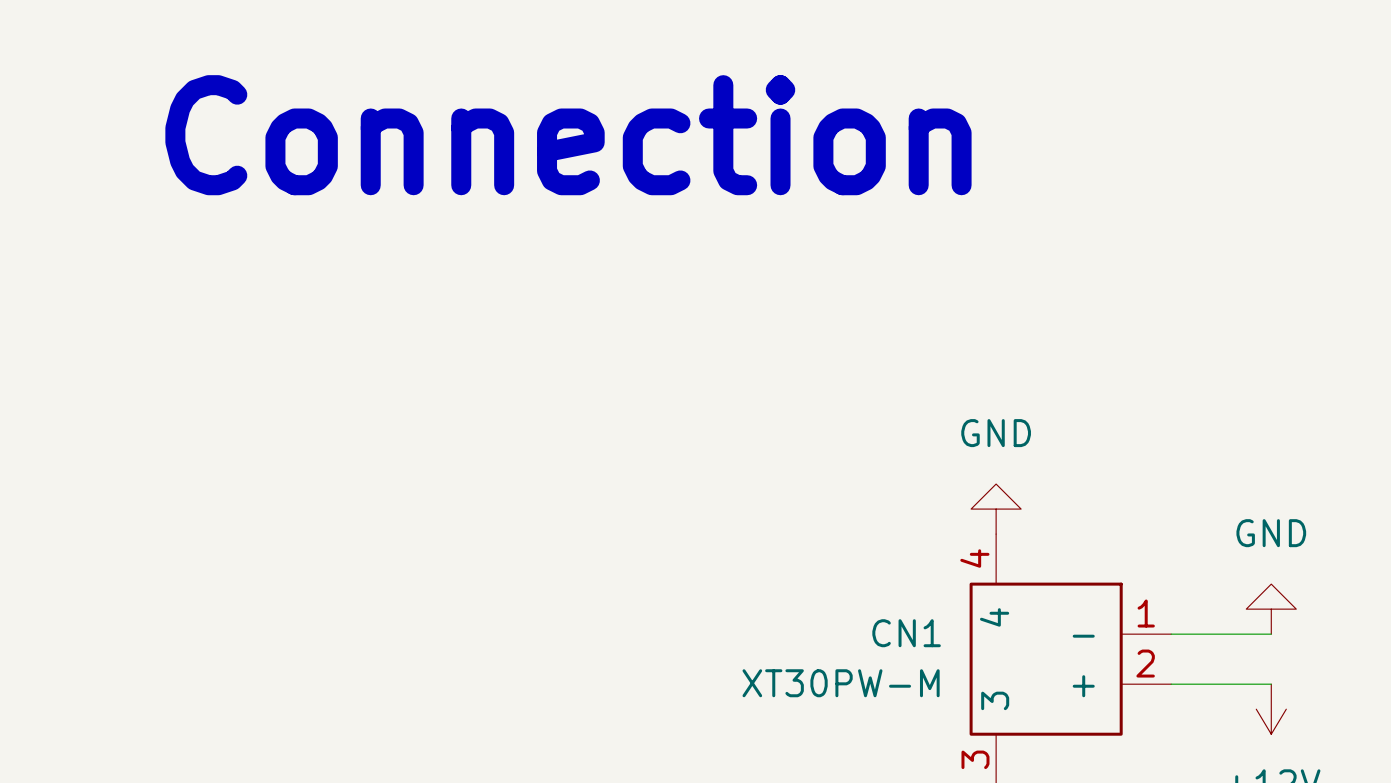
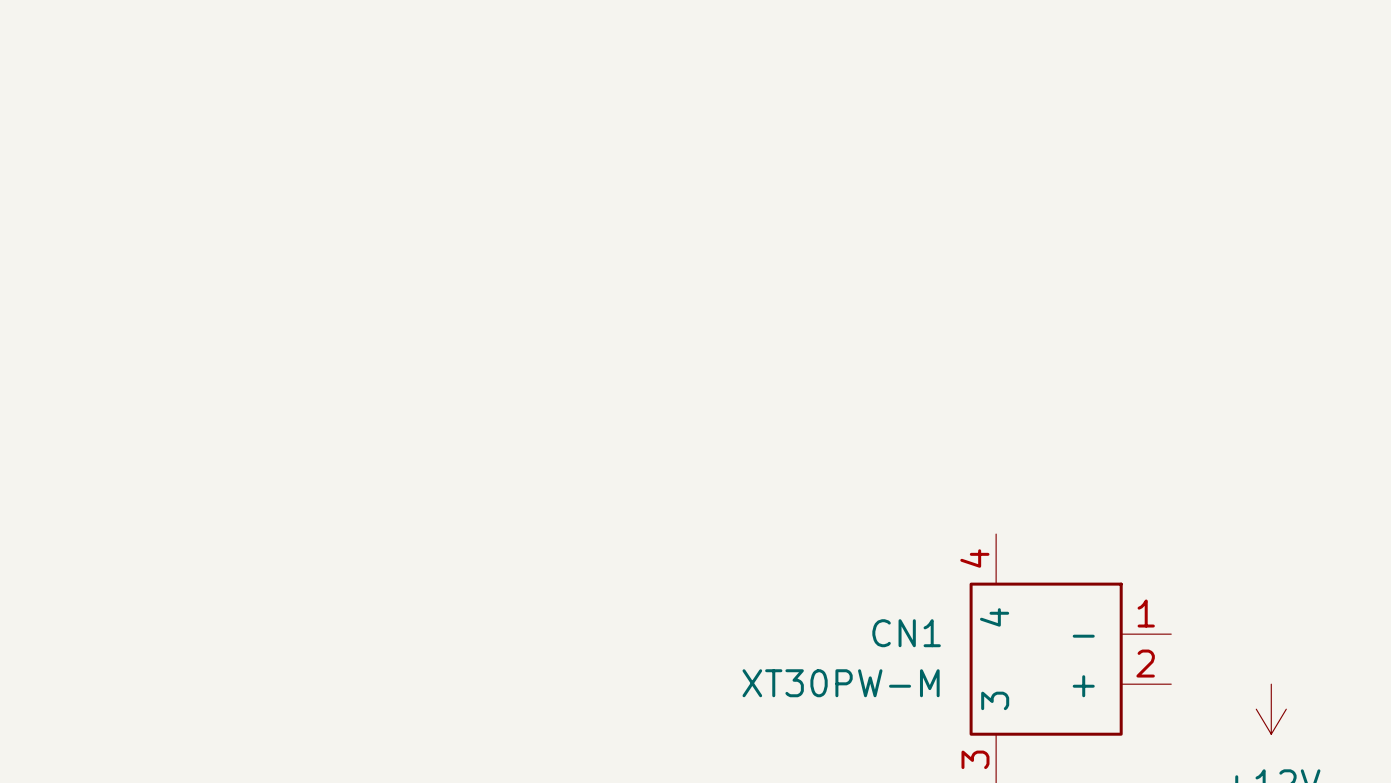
text: Connection (568, 135) -> none
power symbol: GND (996, 509) -> none
power symbol: GND (1271, 609) -> none
wire: (1171, 634) (1271, 634) -> none
wire: (1171, 684) (1271, 684) -> none

